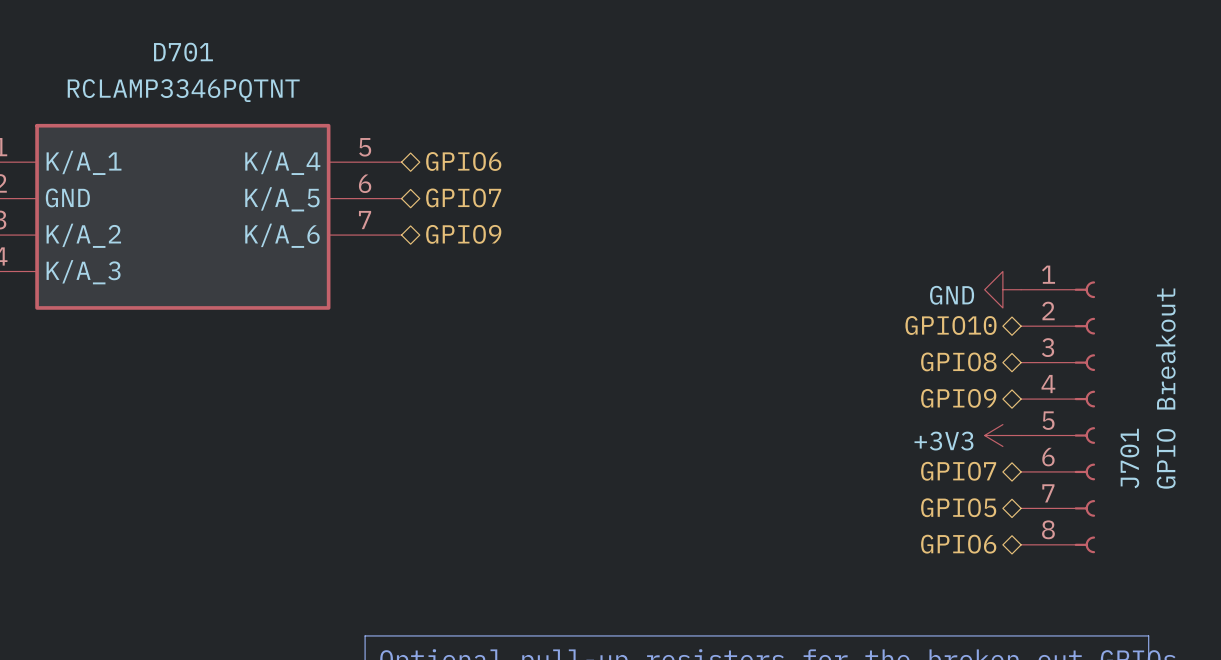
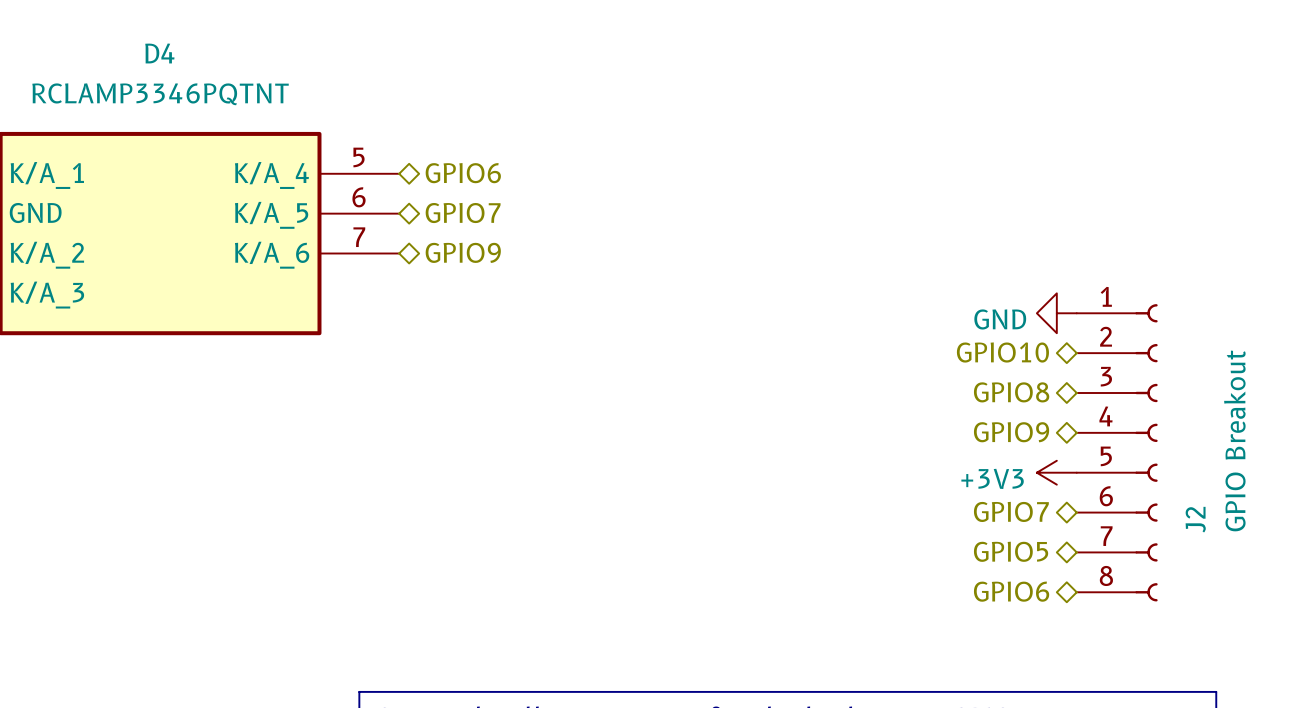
D701 name: D701 (183, 52) -> D4 (159, 53)
J701 name: J701 (1129, 458) -> J2 (1195, 519)

